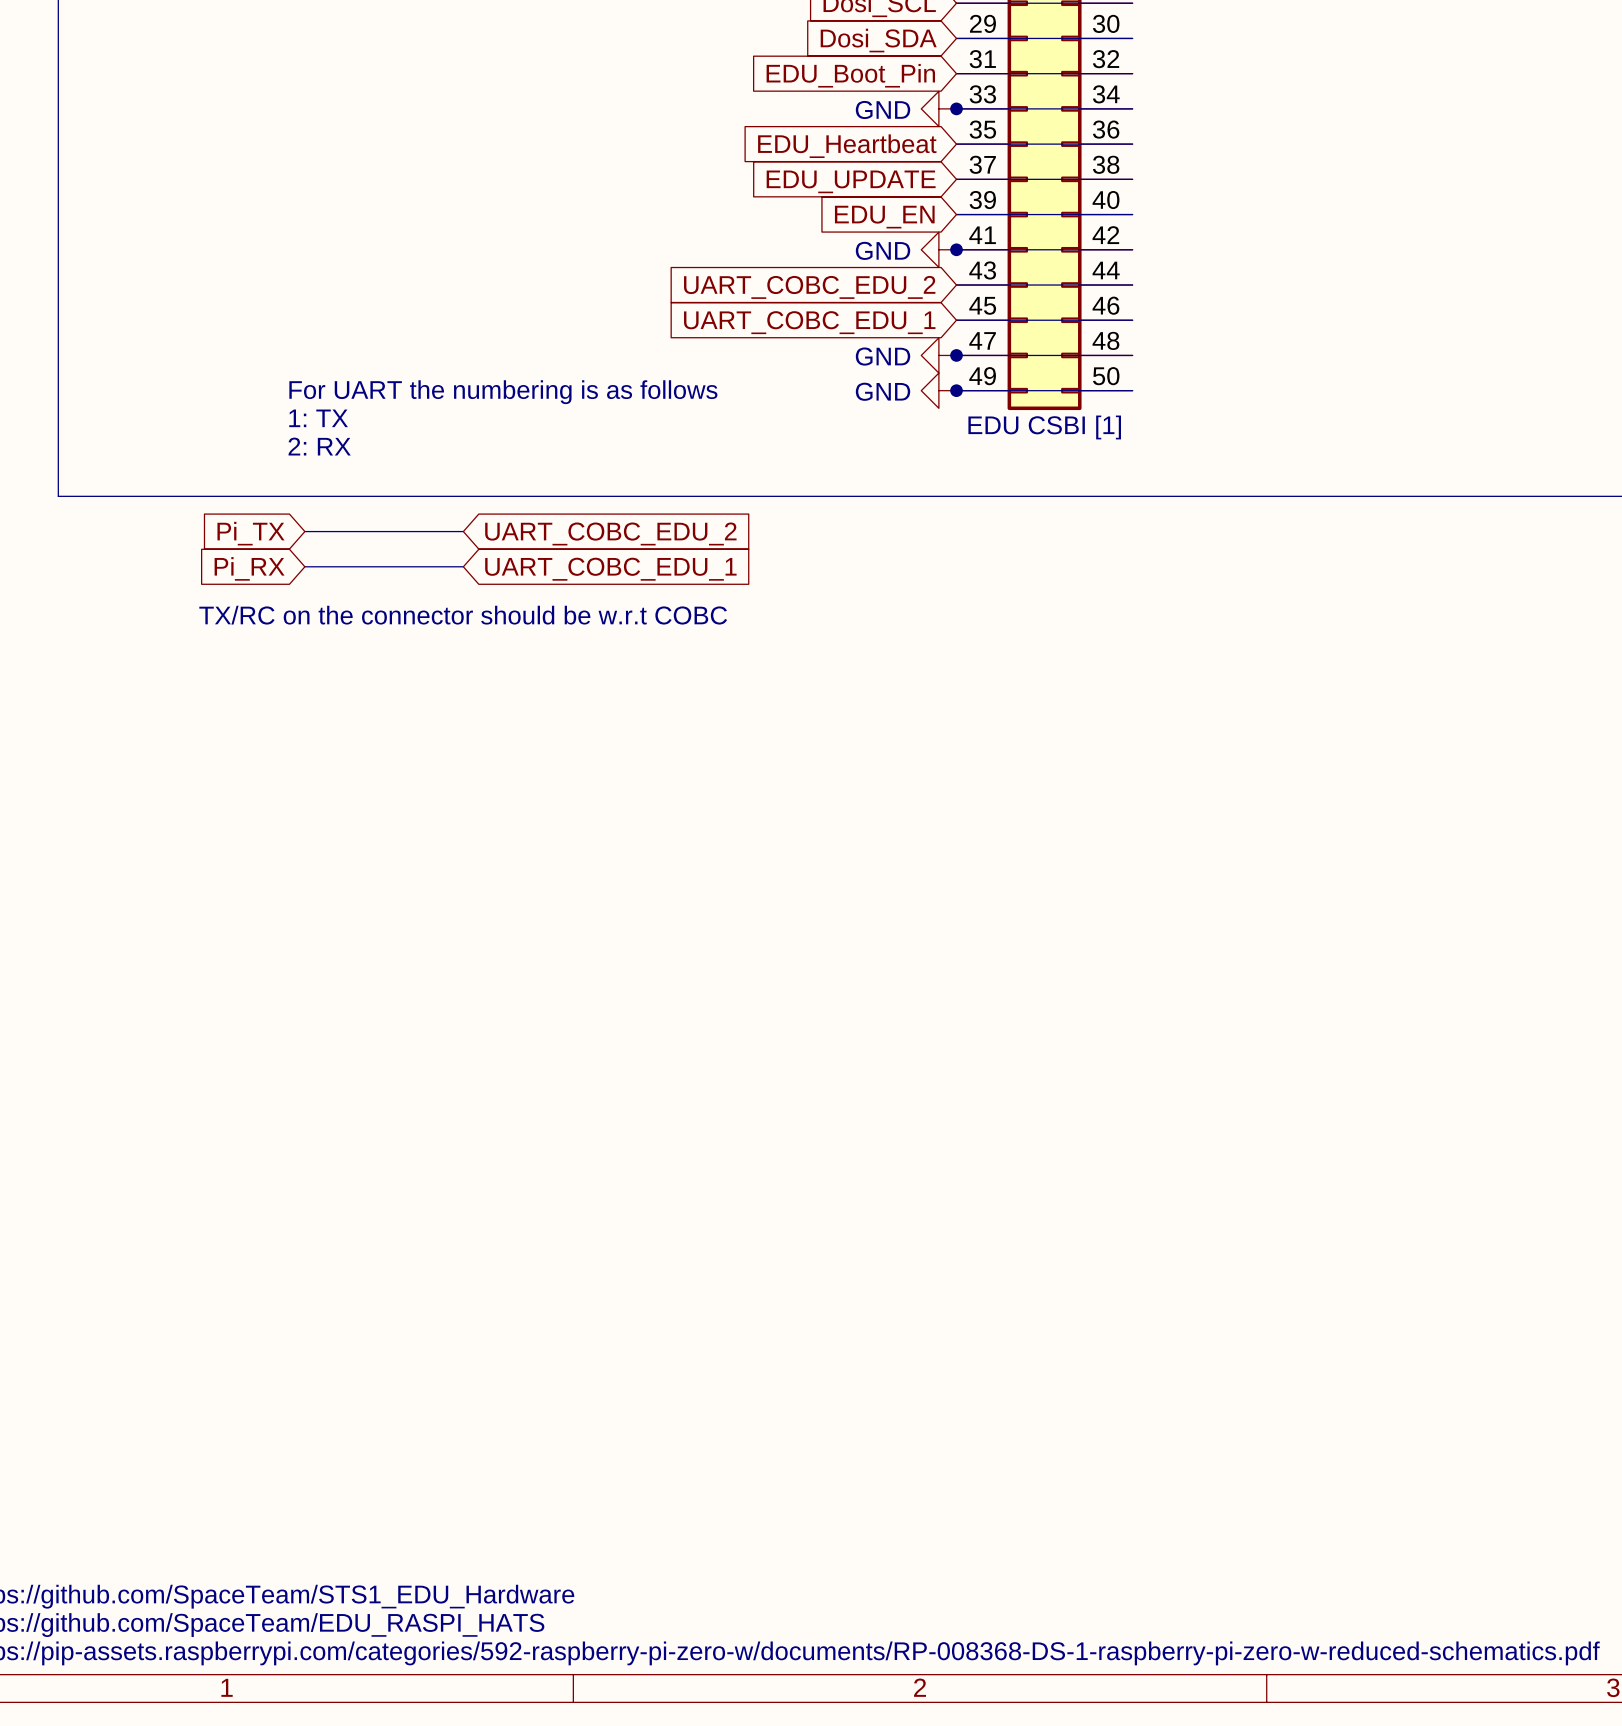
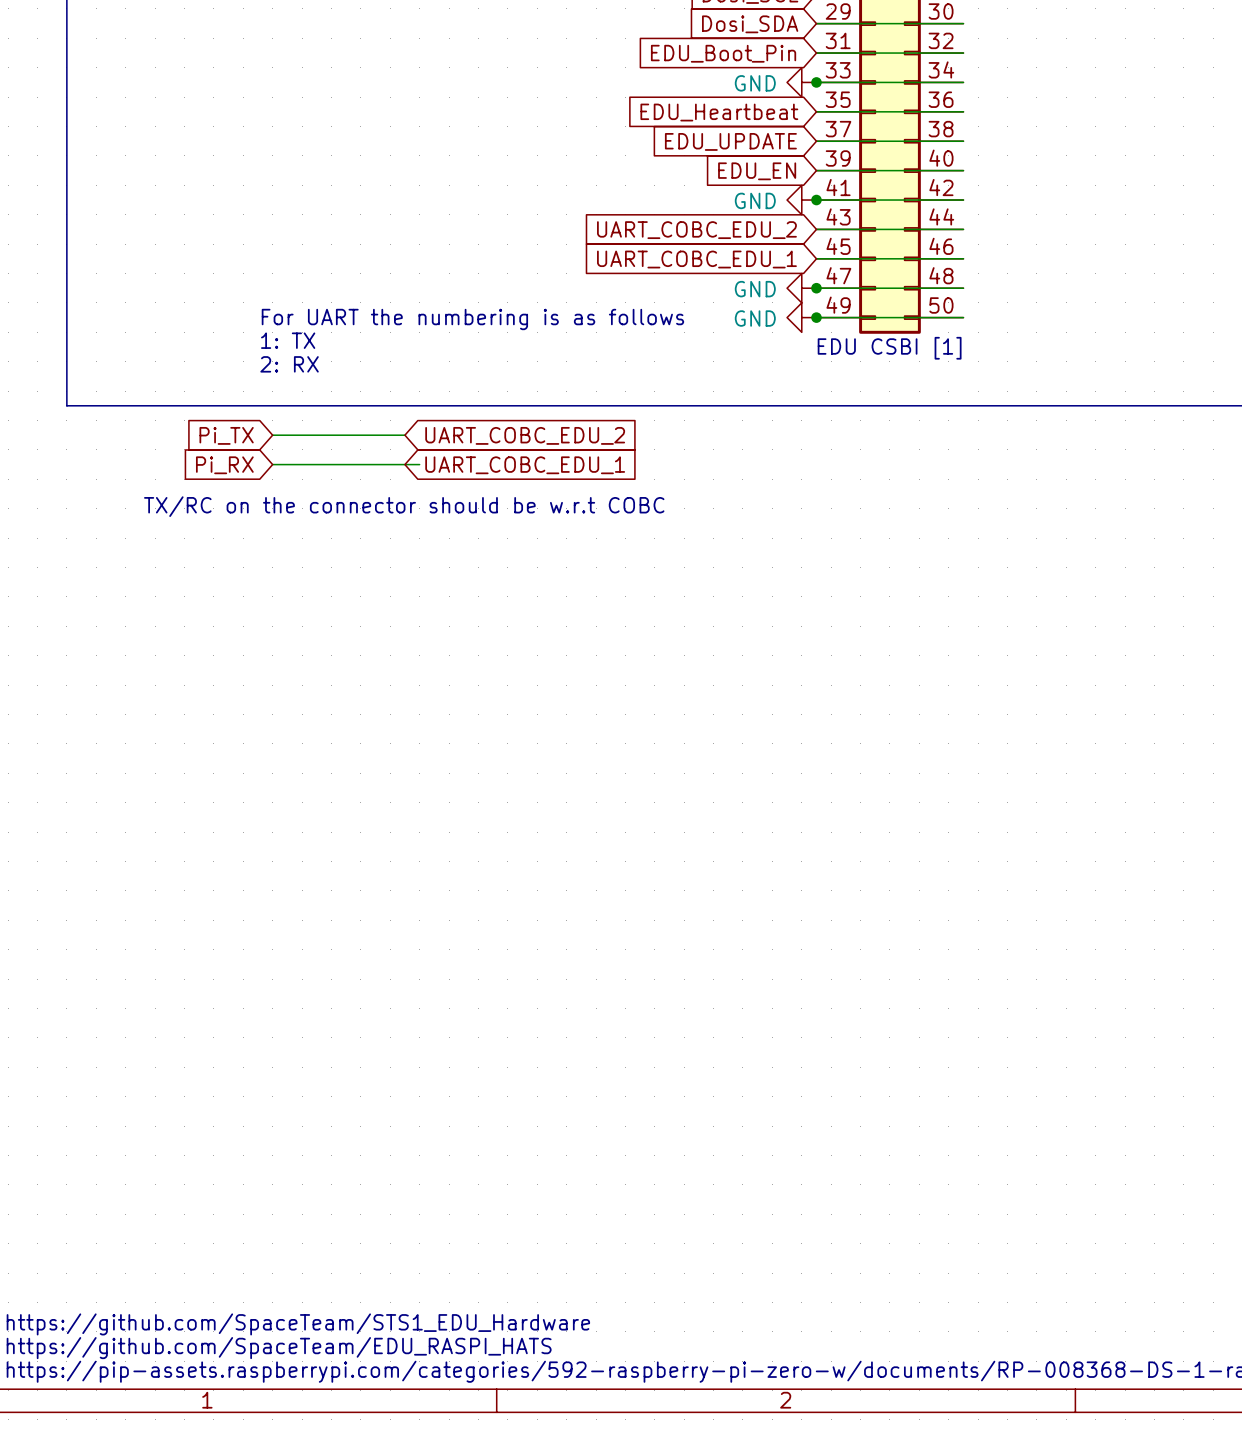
wire: none -> (404, 464) (419, 464)

